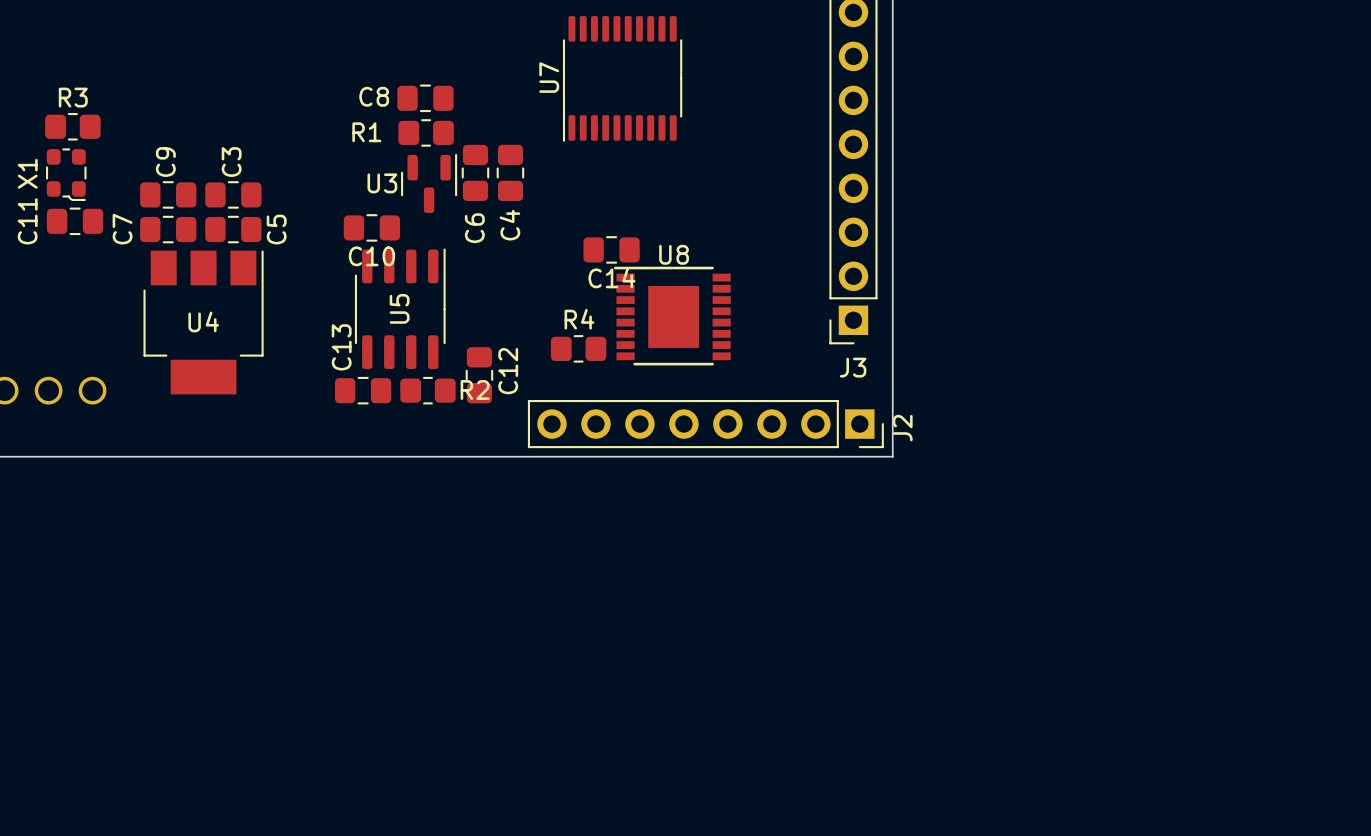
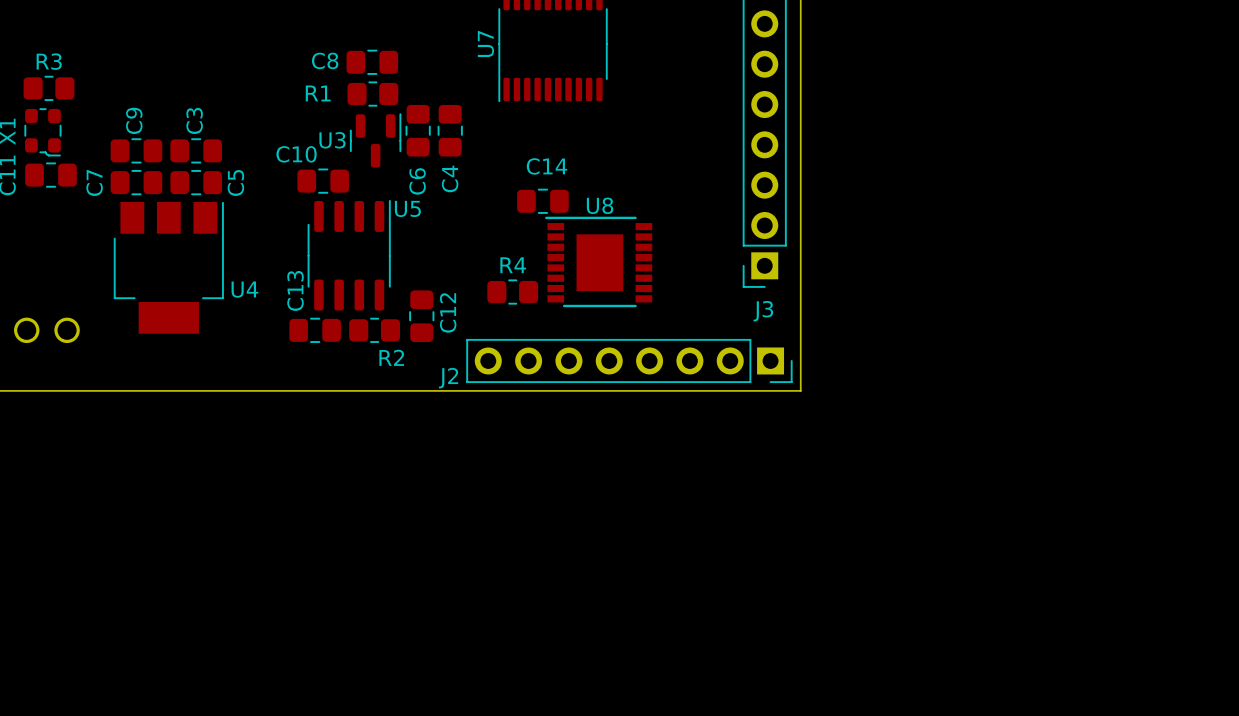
C10 name position: C10 (371, 256) -> C10 (296, 154)
C14 name position: C14 (612, 277) -> C14 (546, 166)
U5 name rotation: 0° (399, 308) -> 90° clockwise (407, 208)
U5 name position: U5 (399, 308) -> U5 (407, 208)
U4 name position: U4 (203, 321) -> U4 (244, 289)
R2 name position: R2 (475, 390) -> R2 (391, 357)
J2 name rotation: 0° (902, 428) -> 90° clockwise (448, 378)
J2 name position: J2 (902, 428) -> J2 (448, 378)

